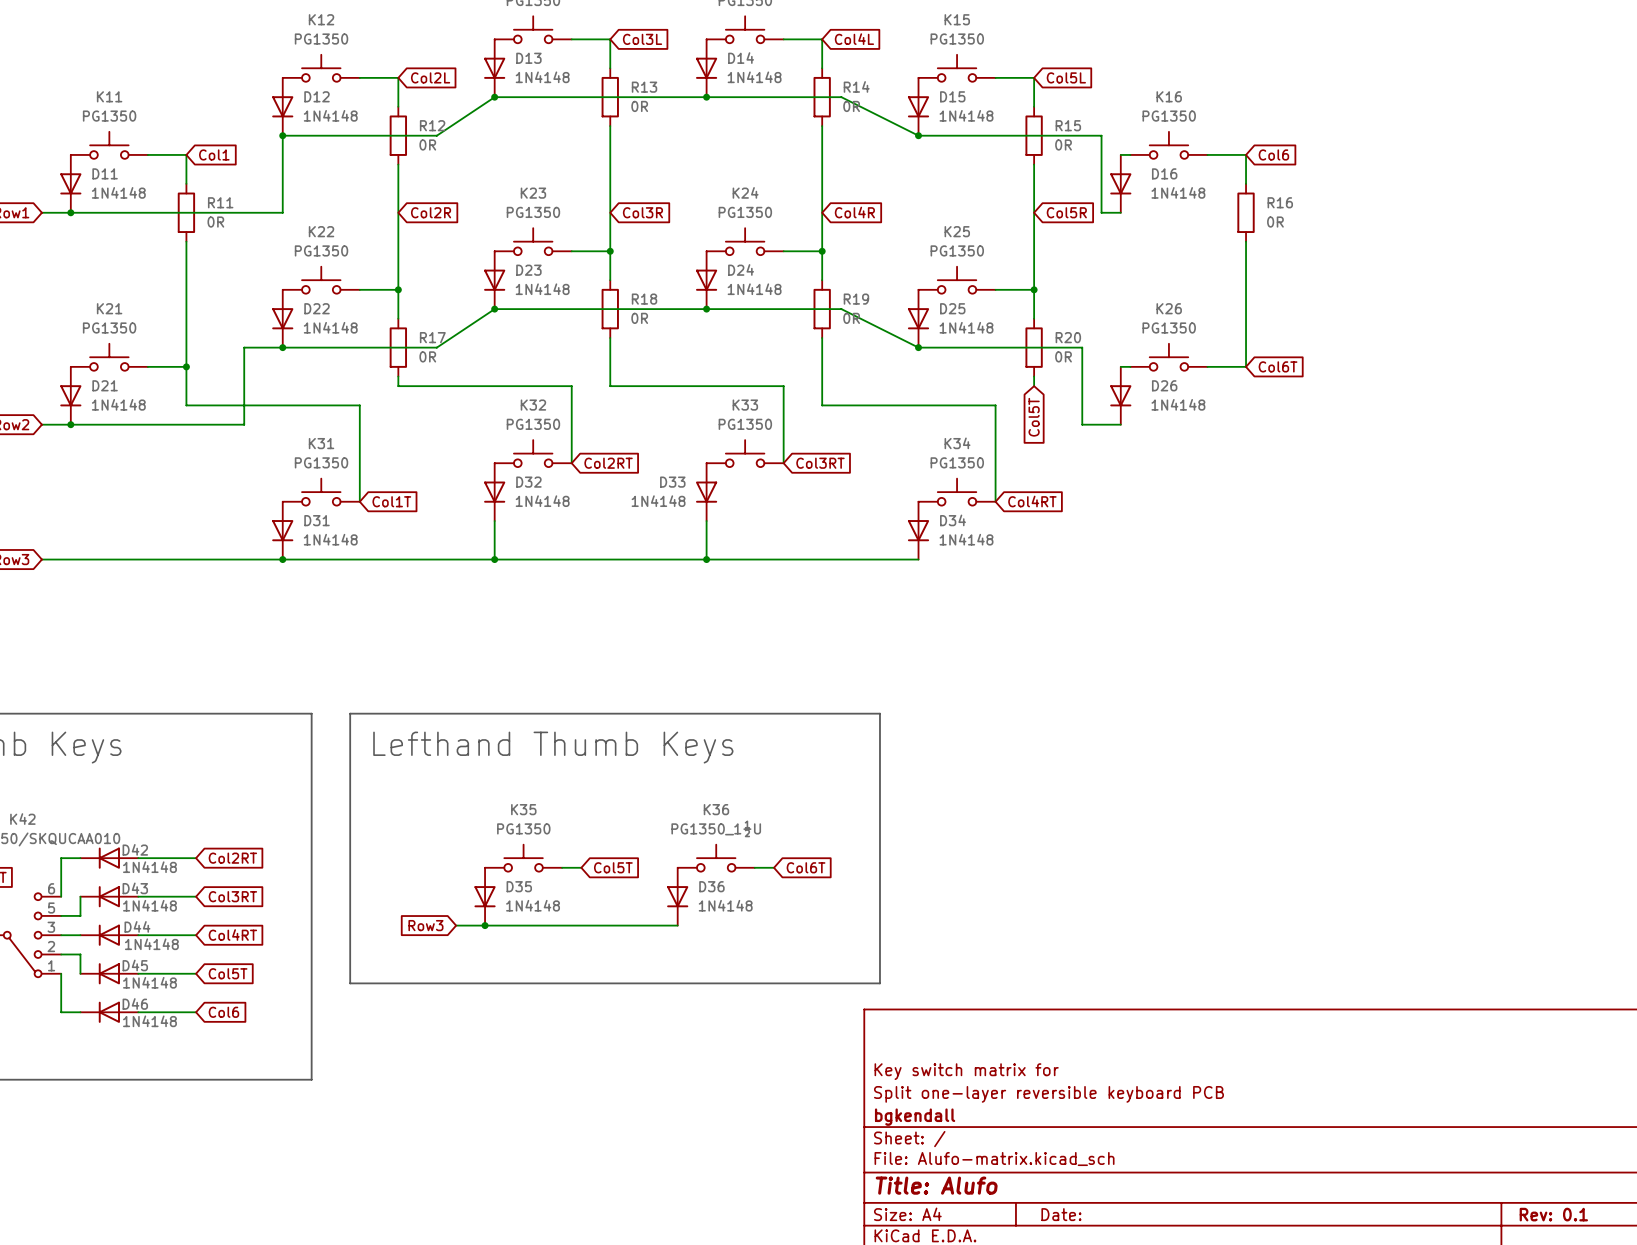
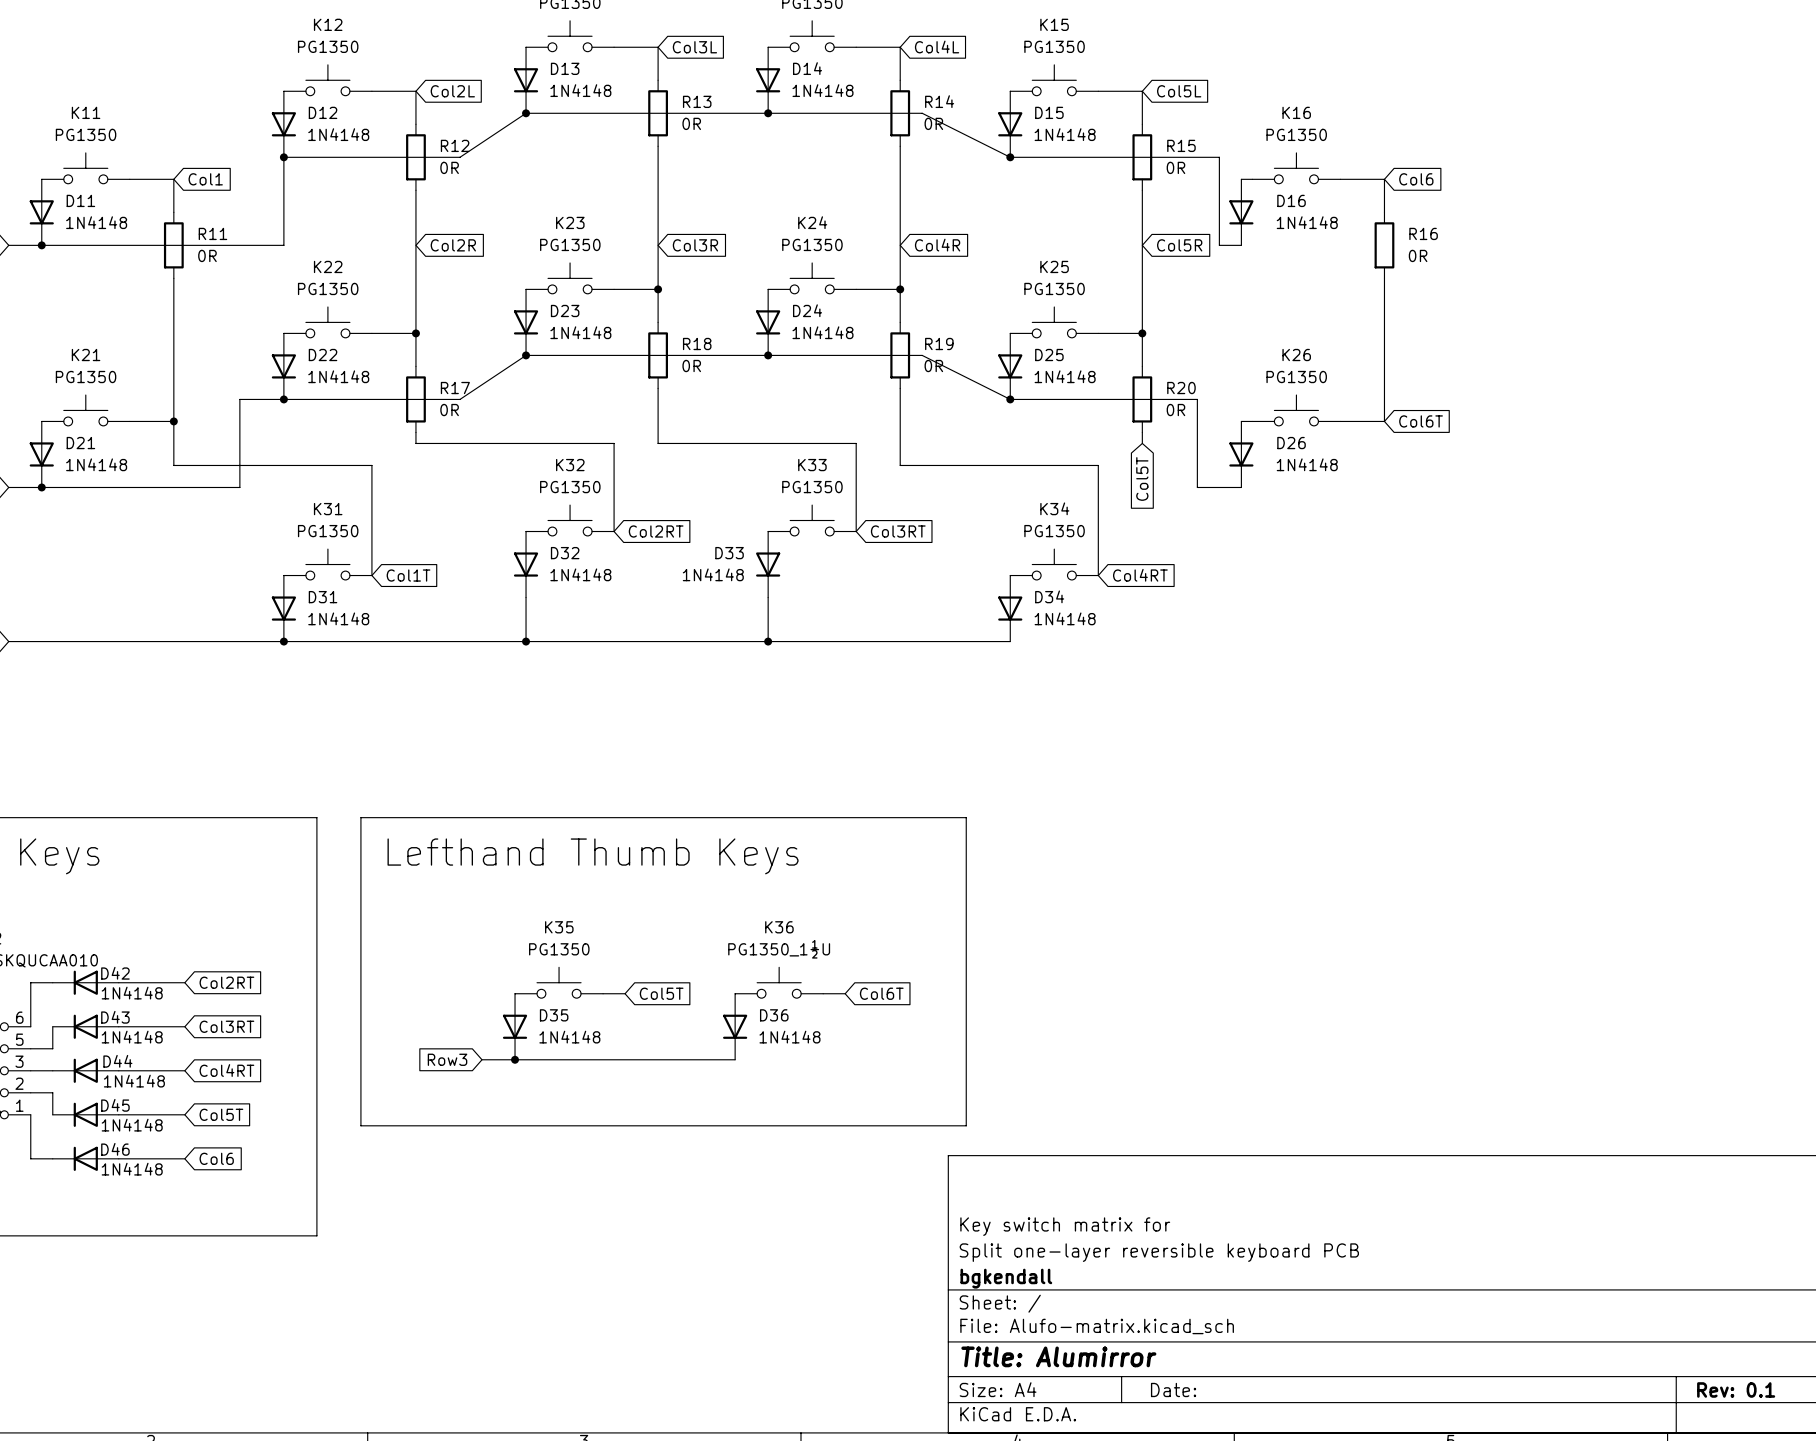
title block: Title: Alufo (936, 1185) -> Title: Alumirror (1058, 1356)

